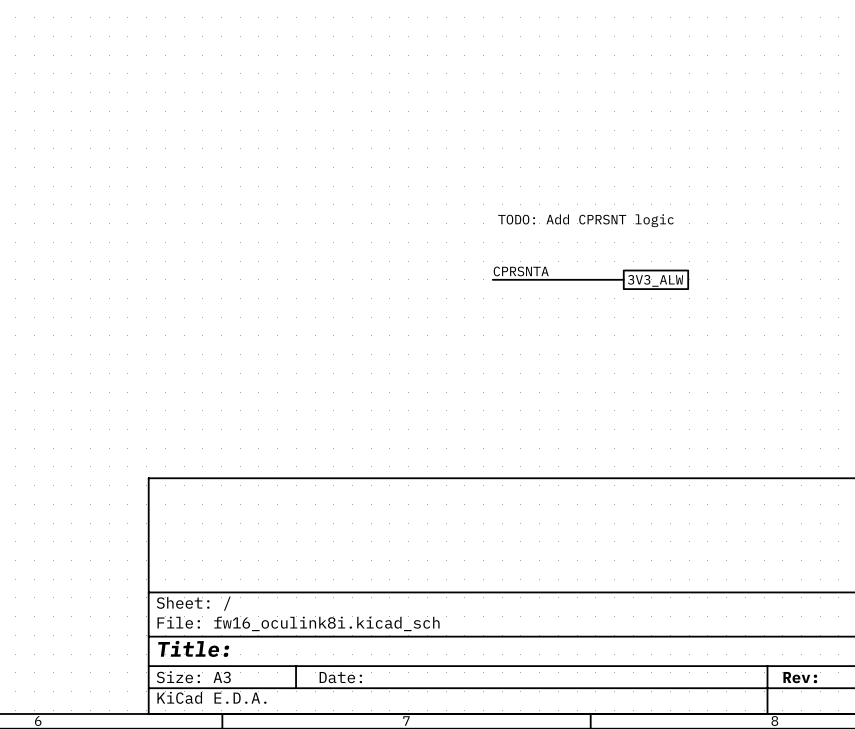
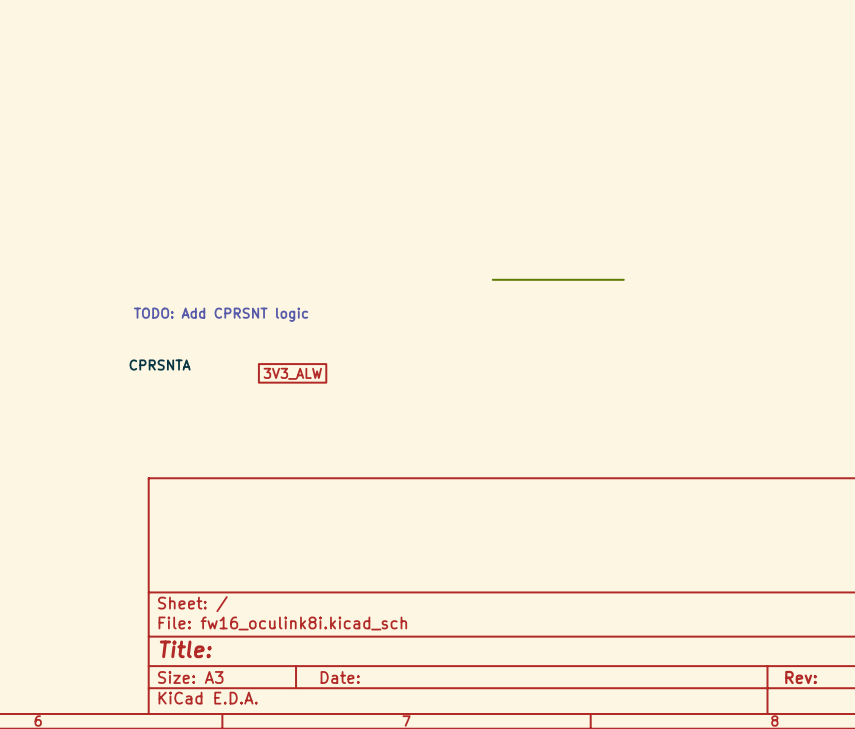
text: TODO: Add CPRSNT logic (585, 220) -> none
label: CPRSNTA (521, 271) -> none
global label: 3V3_ALW (655, 280) -> none
text: none -> TODO: Add CPRSNT logic (221, 314)
label: none -> CPRSNTA (160, 365)
global label: none -> 3V3_ALW (292, 373)

